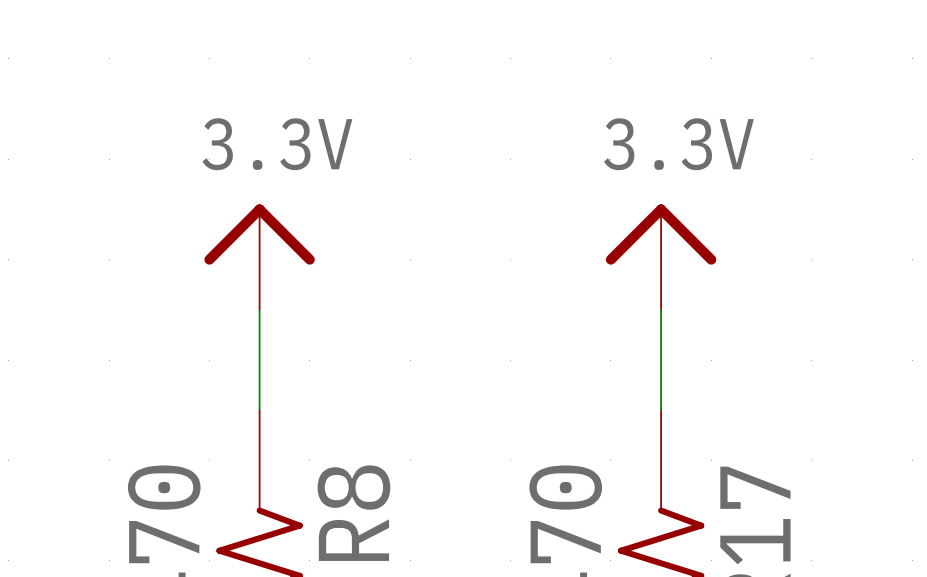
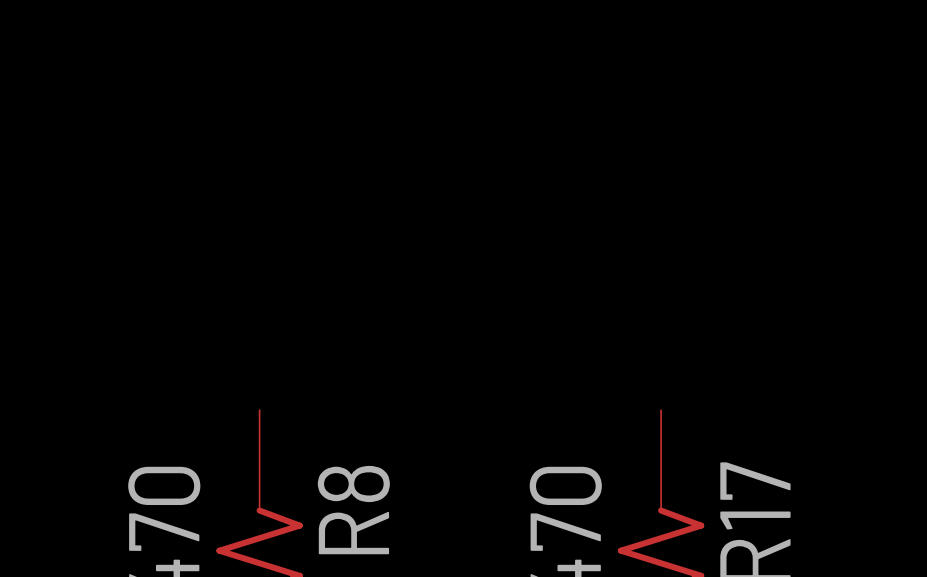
power symbol: 3.3V (259, 257) -> none
power symbol: 3.3V (661, 257) -> none
wire: (259, 309) (259, 410) -> none
wire: (661, 309) (661, 410) -> none

